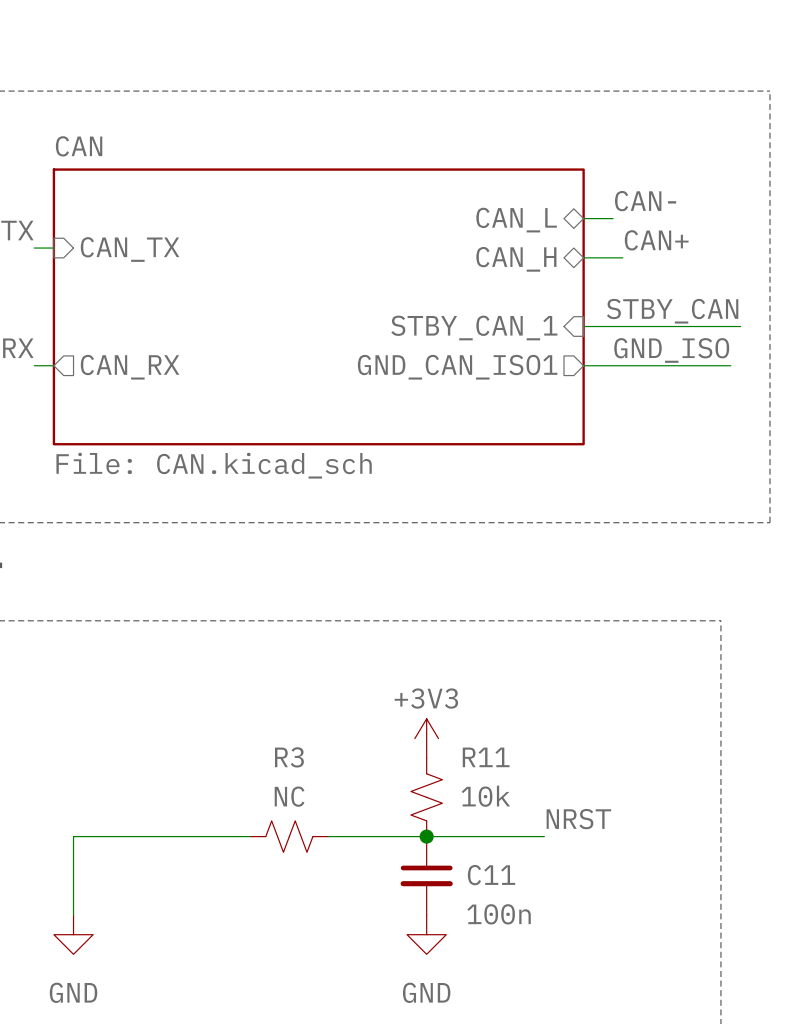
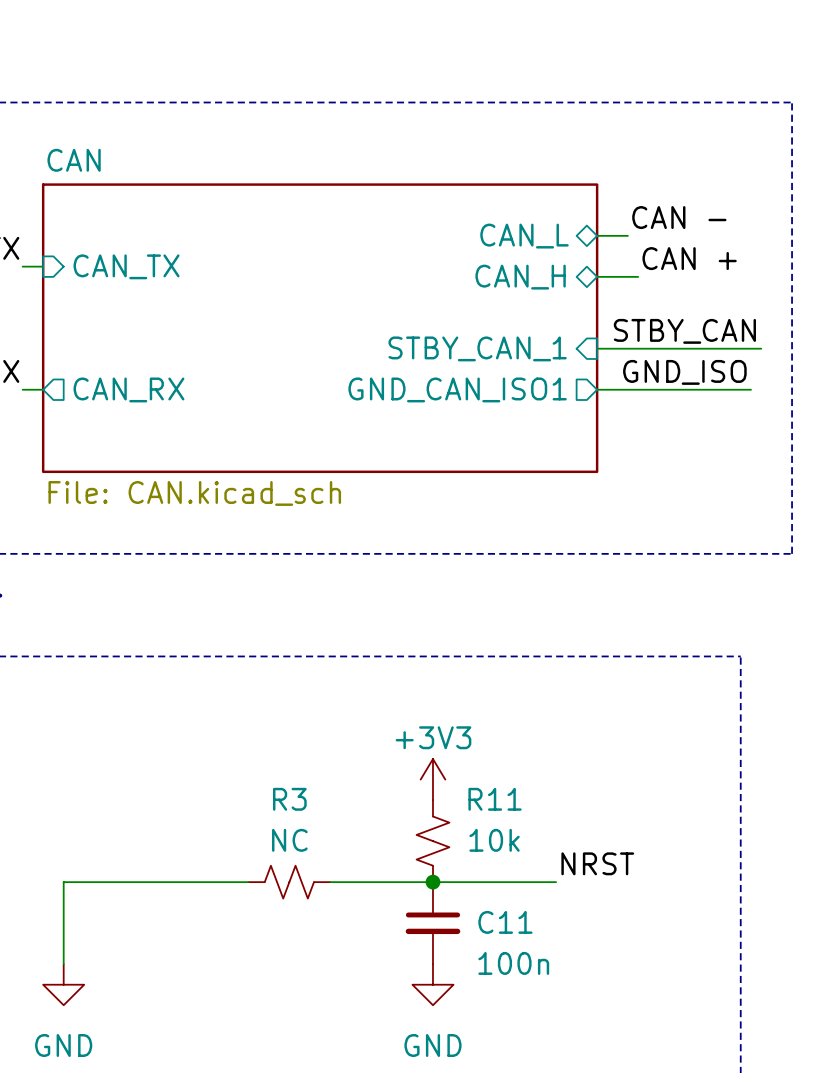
label: CAN- (645, 201) -> CAN - (679, 217)
label: CAN+ (656, 240) -> CAN + (689, 258)

